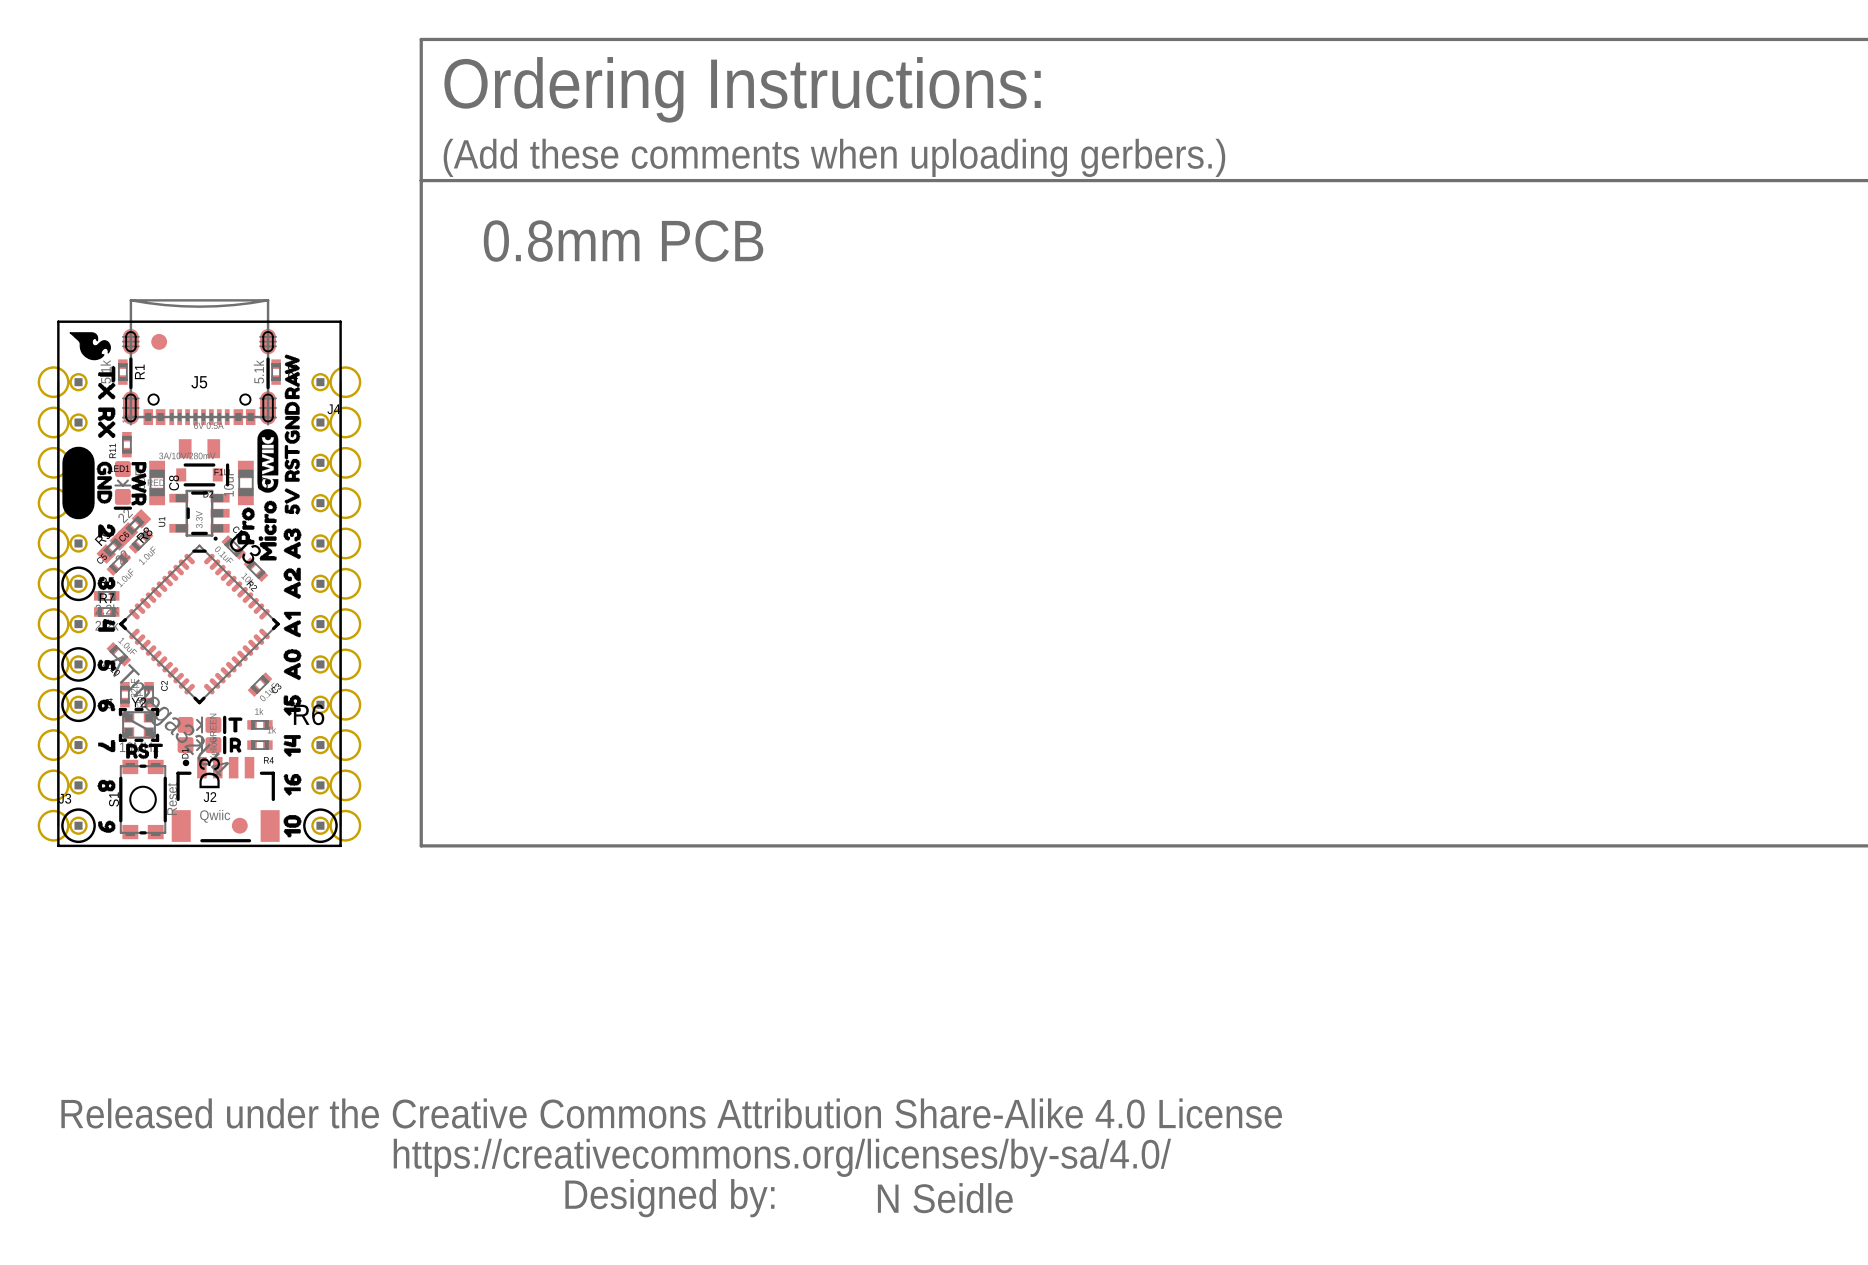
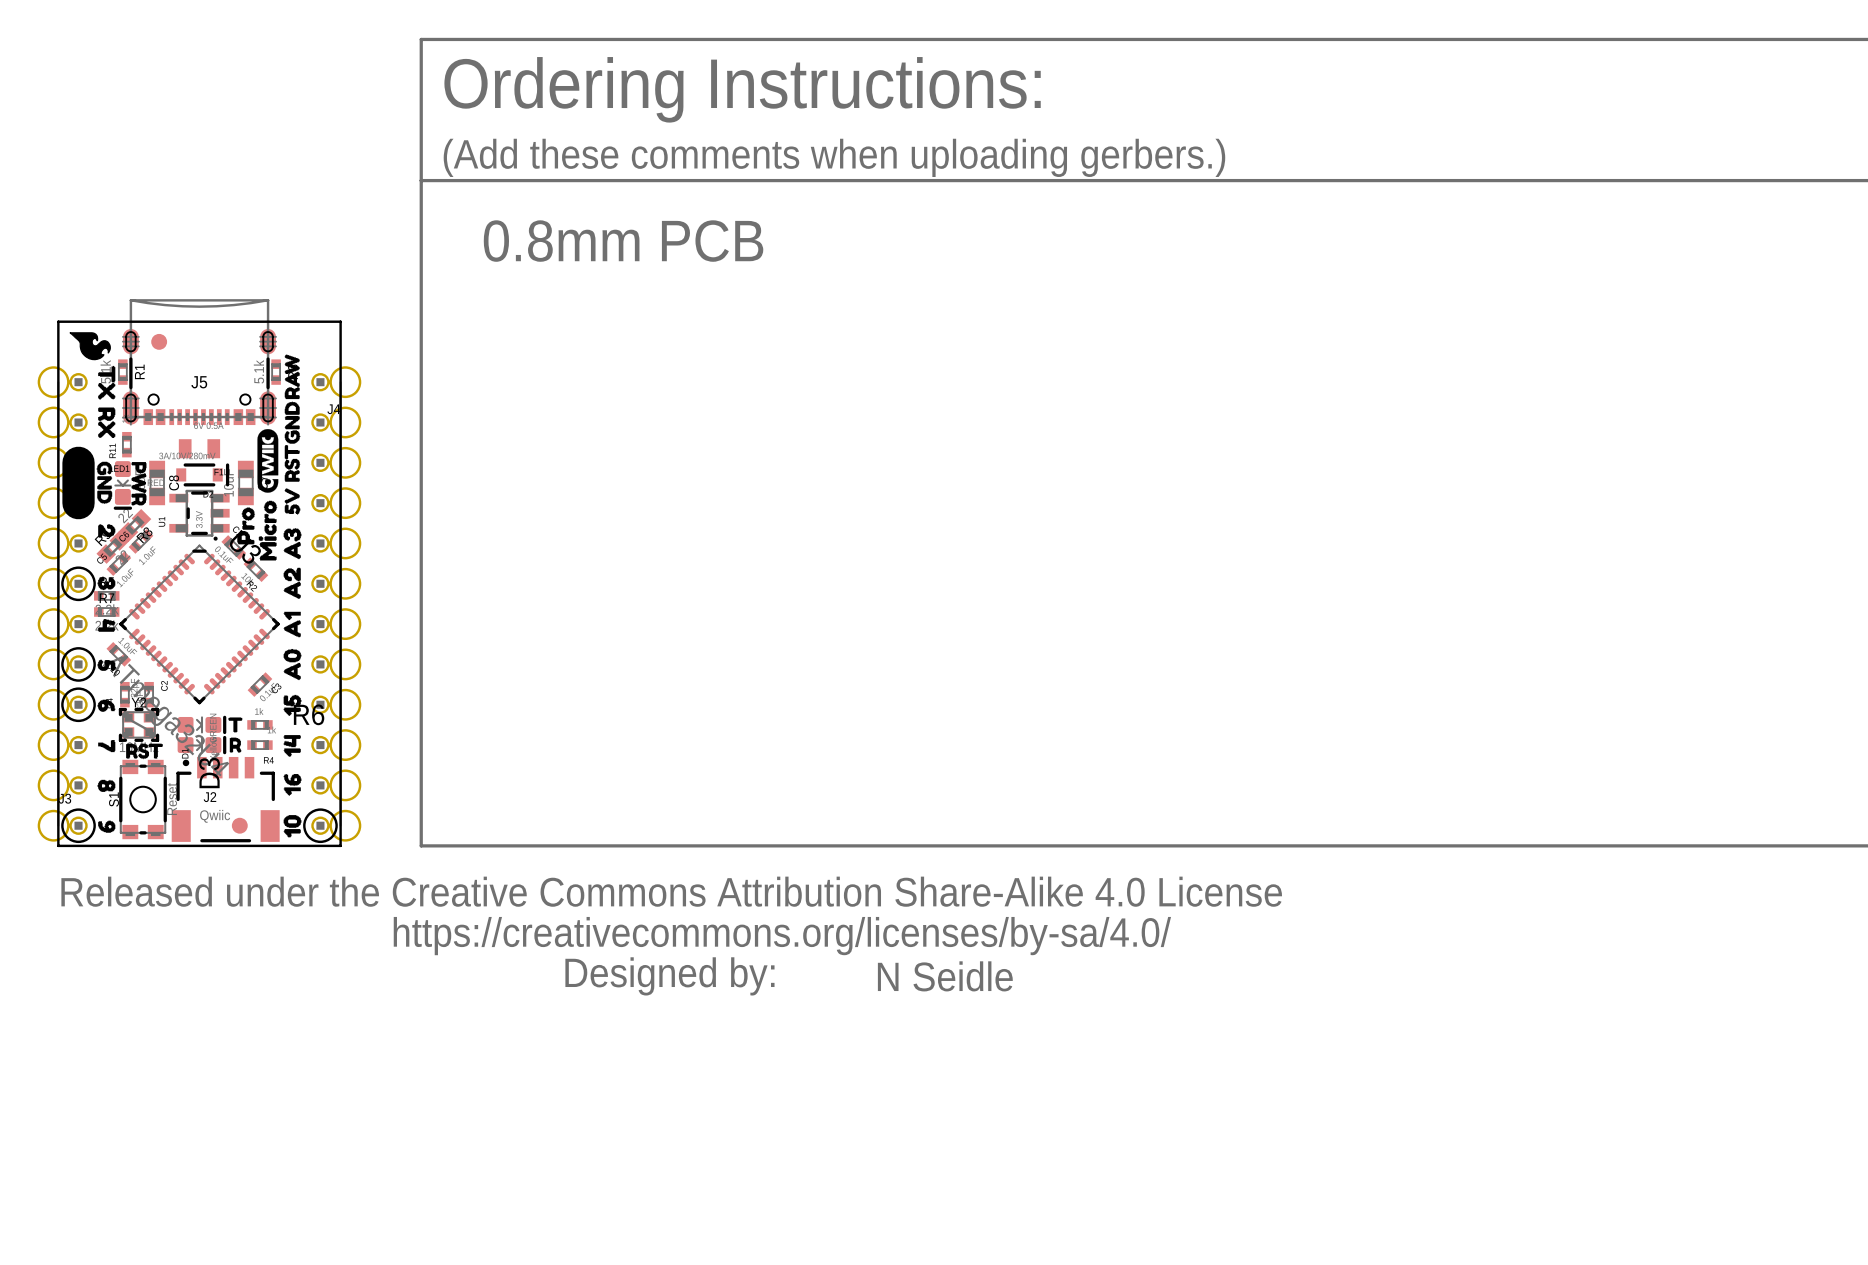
drawing position: (671, 1157) -> (671, 936)
text position: N Seidle (945, 1198) -> N Seidle (945, 976)

